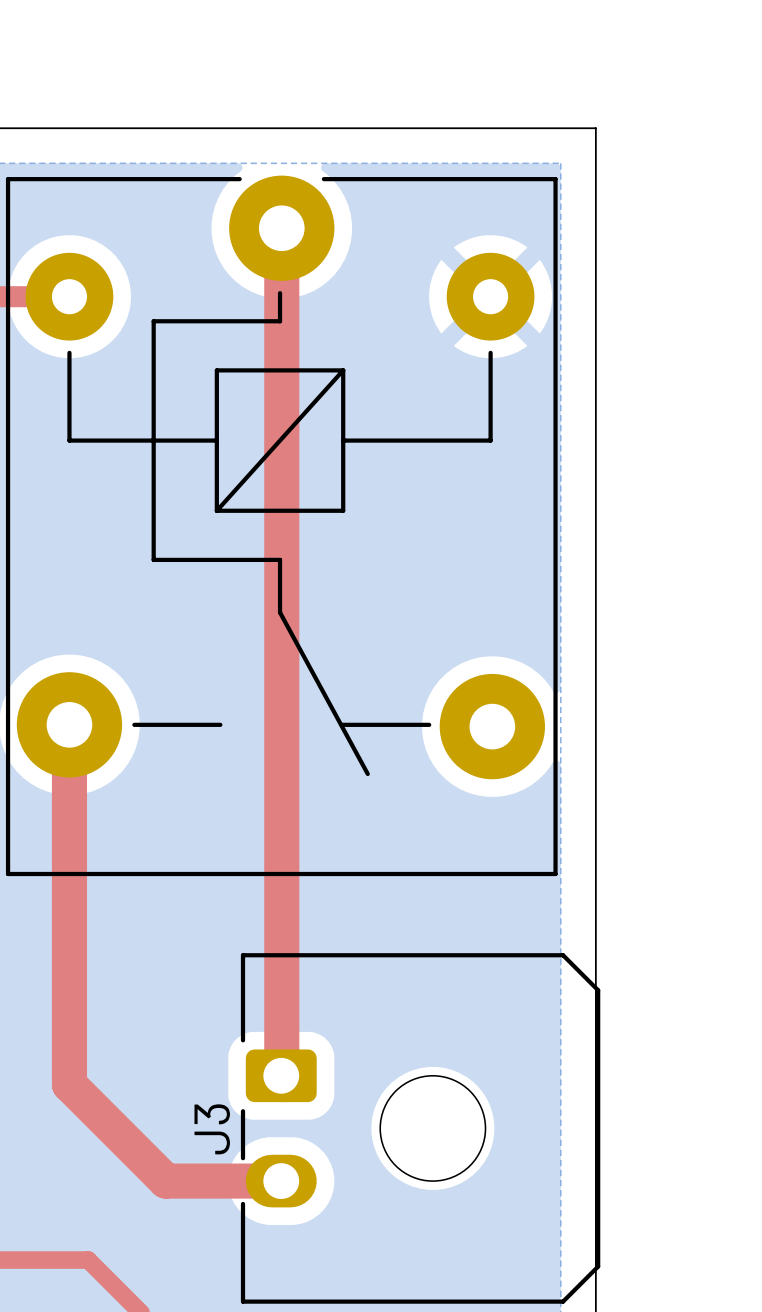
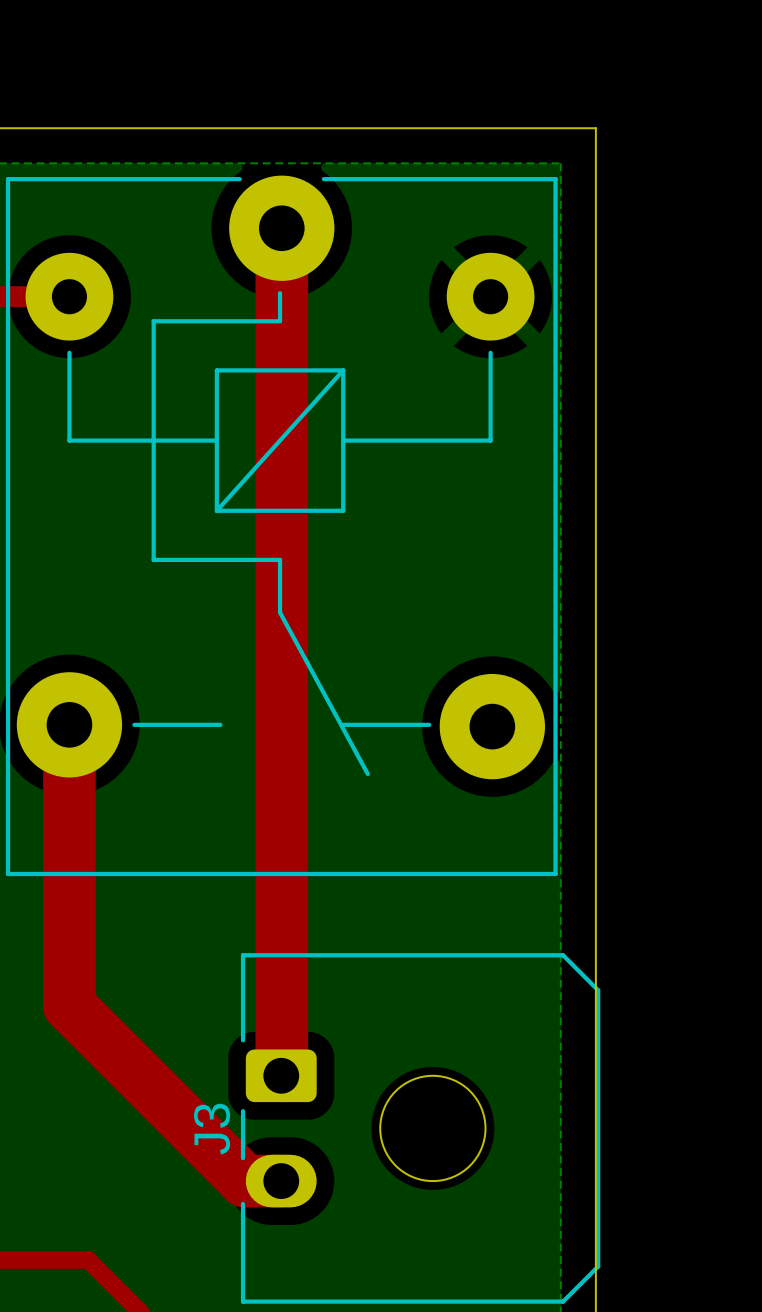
top track width: thin (281, 228) (281, 1075) -> thick (281, 228) (281, 1075)
top track width: thin (69, 724) (69, 1005) -> thick (69, 724) (69, 1005)
top track: (69, 1005) (69, 1084) (165, 1181) (244, 1181) -> (69, 1005) (244, 1181)

